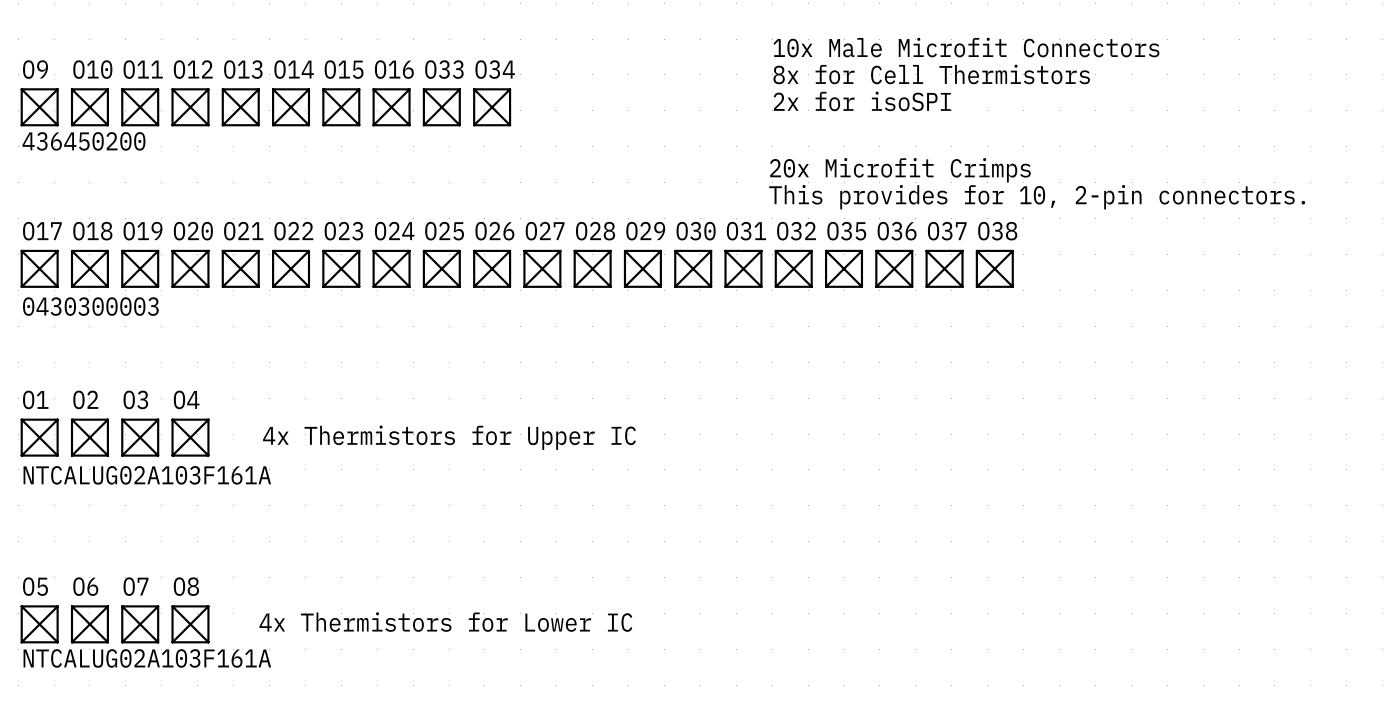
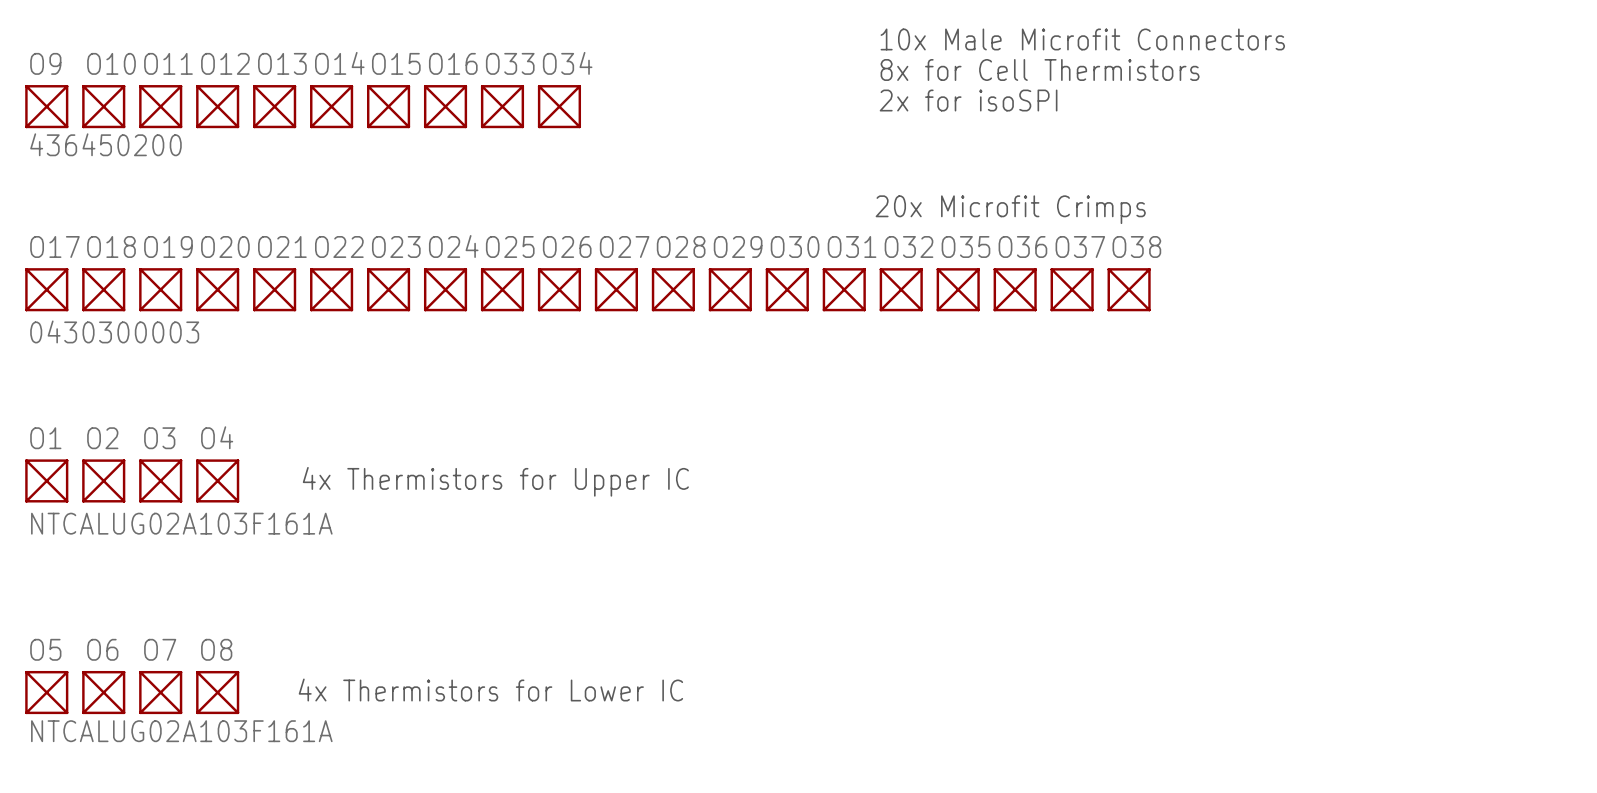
text: 20x Microfit Crimps (900, 170) -> none
text: This provides for 10, 2-pin connectors. (1037, 197) -> 20x Microfit Crimps (1010, 209)

